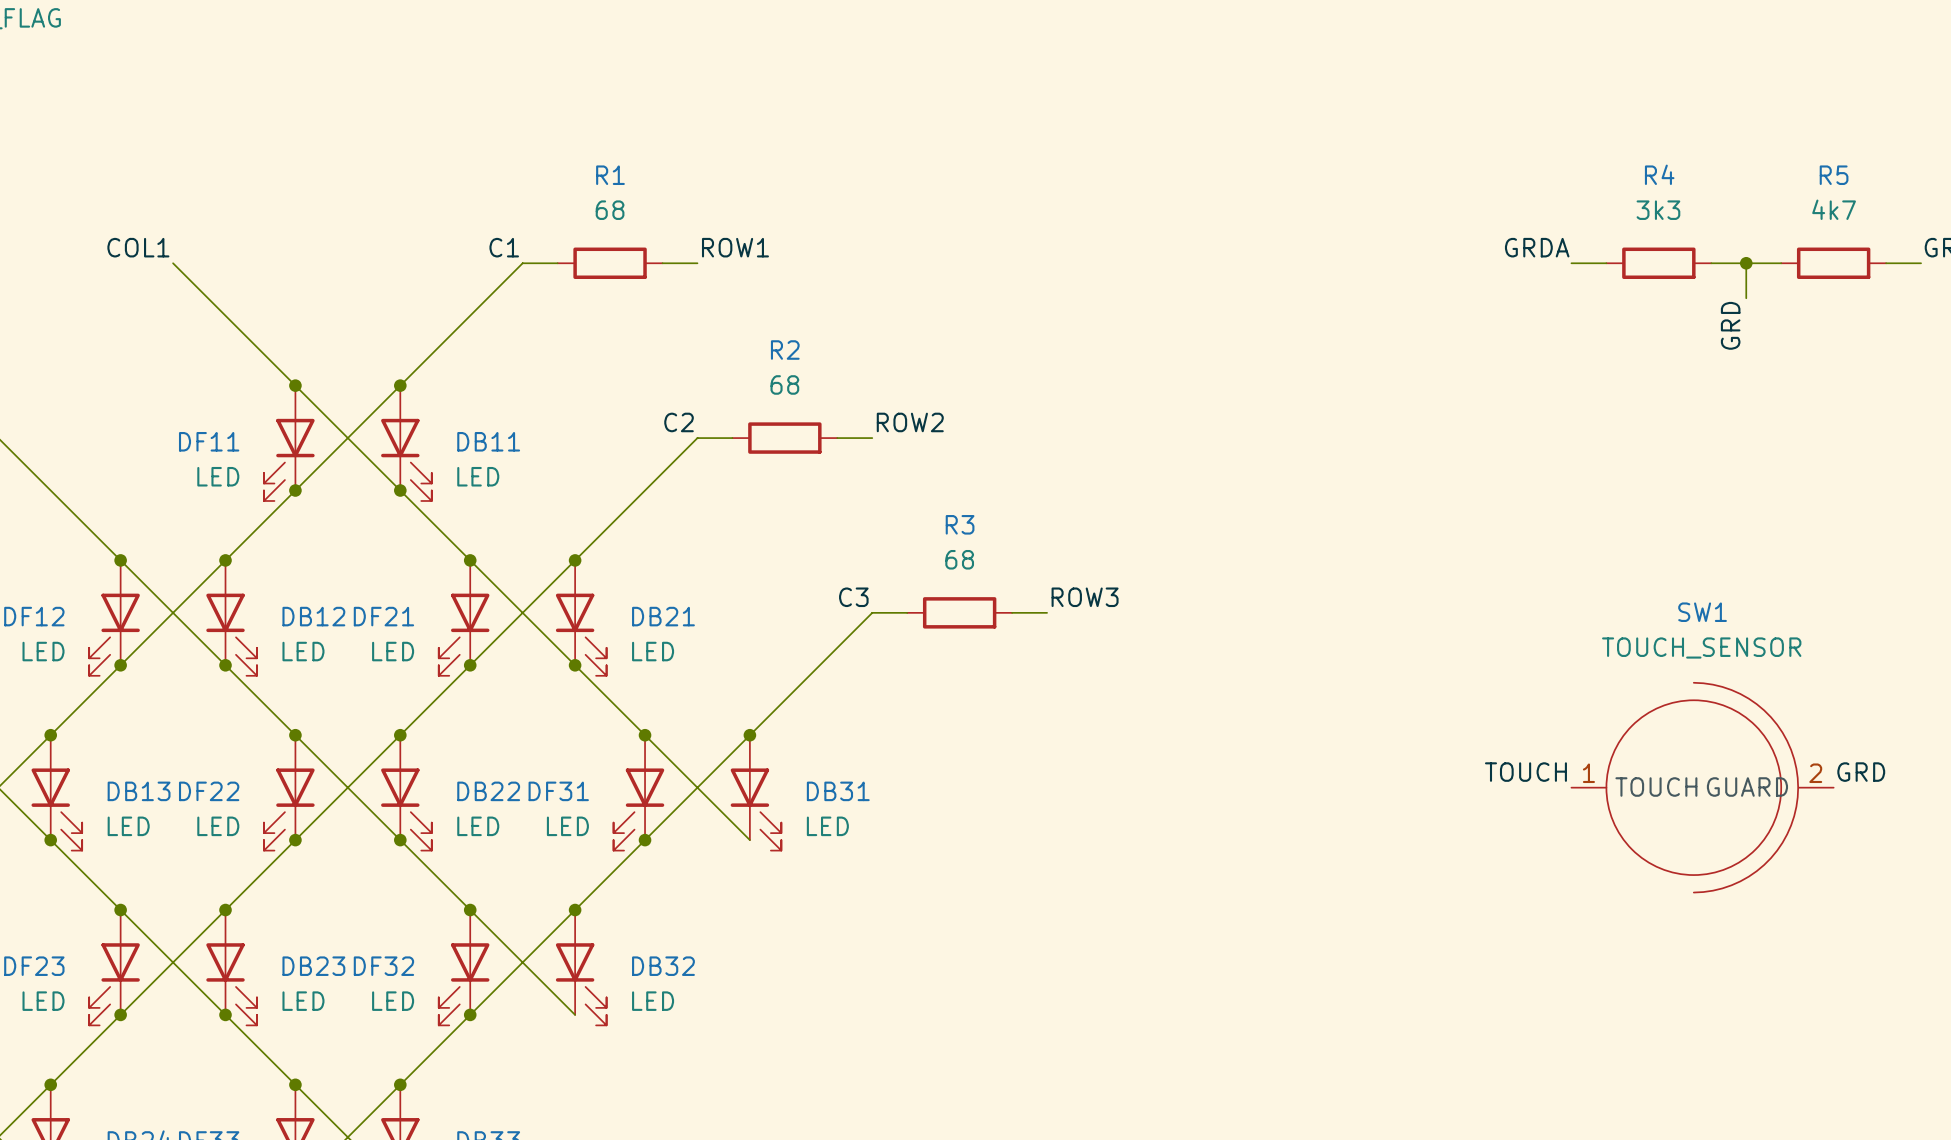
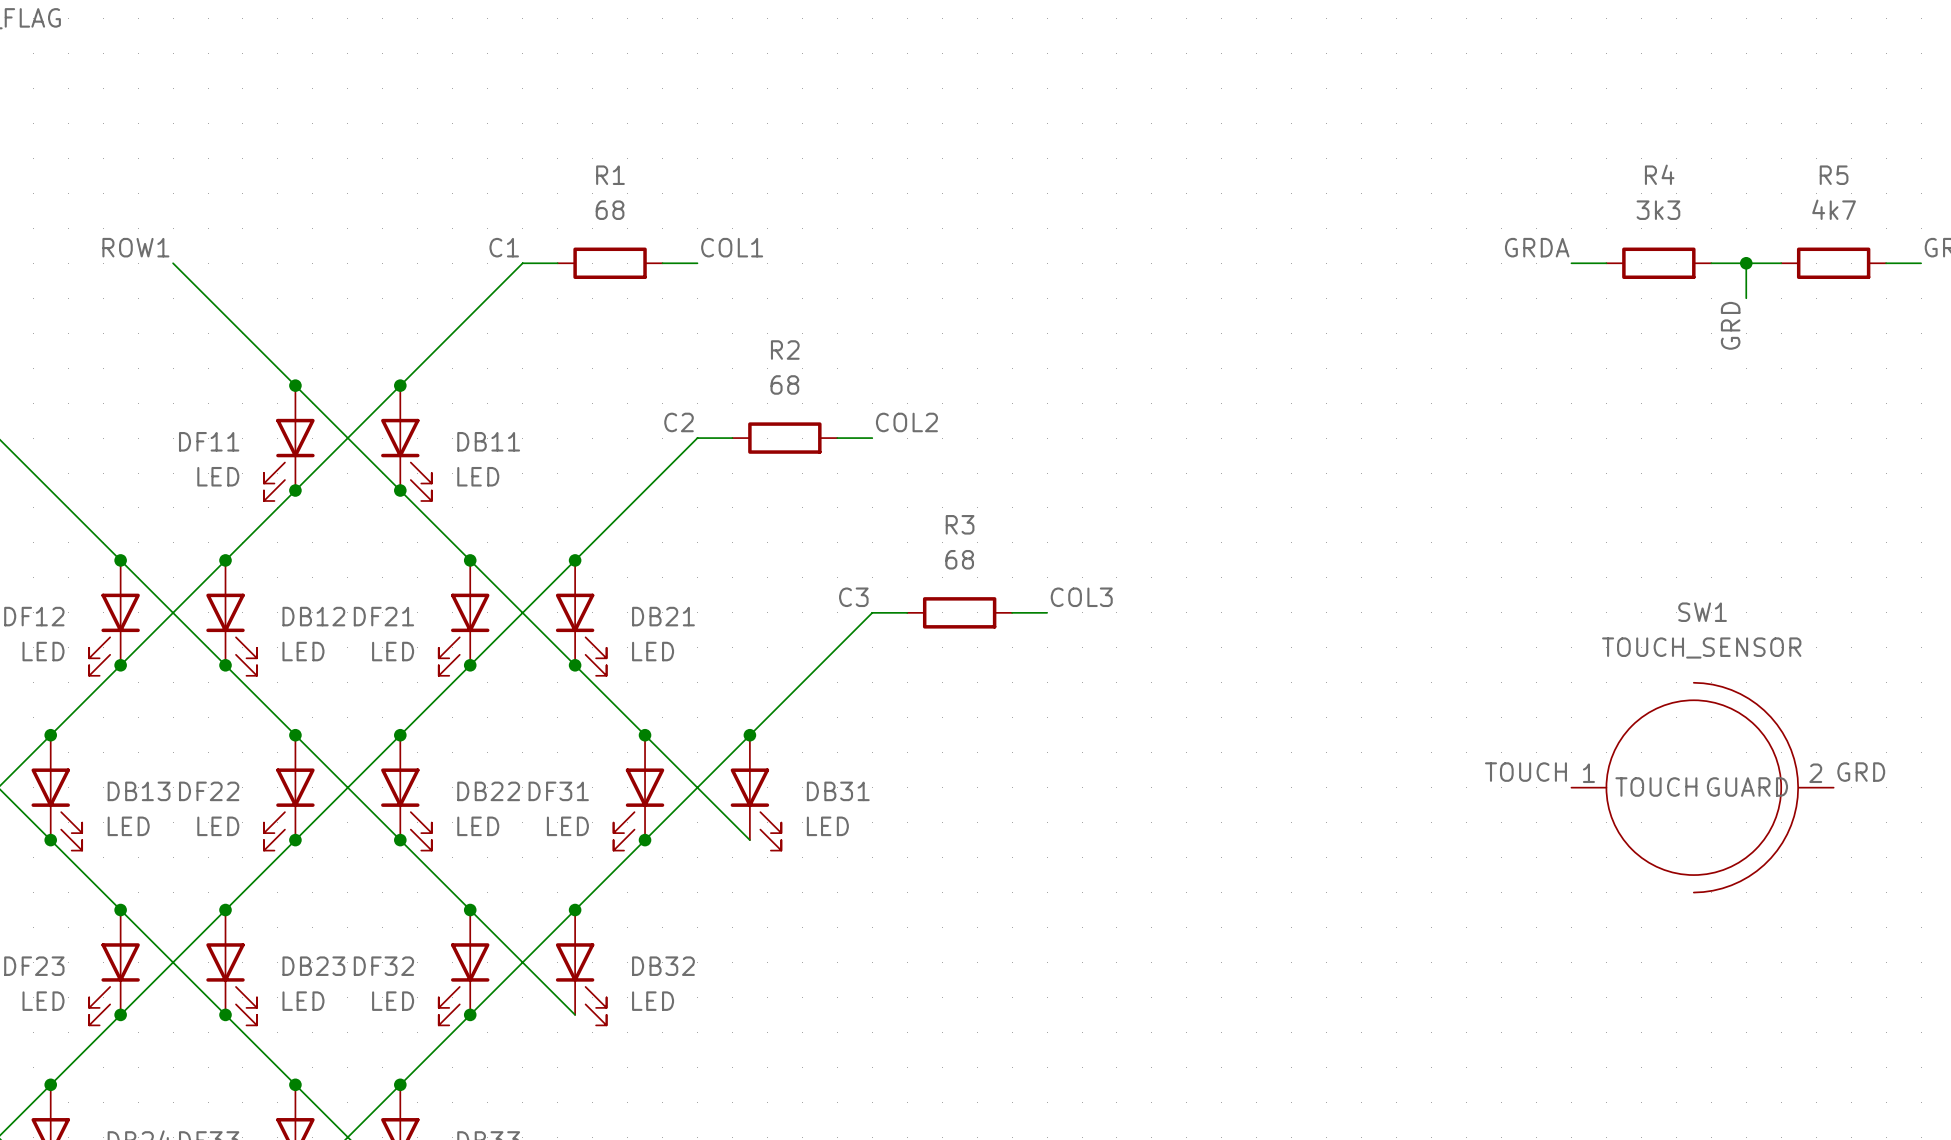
label: COL1 (138, 247) -> ROW1 (135, 247)
label: ROW1 (735, 247) -> COL1 (732, 247)
label: ROW2 (910, 422) -> COL2 (906, 422)
label: ROW3 (1085, 597) -> COL3 (1081, 597)

